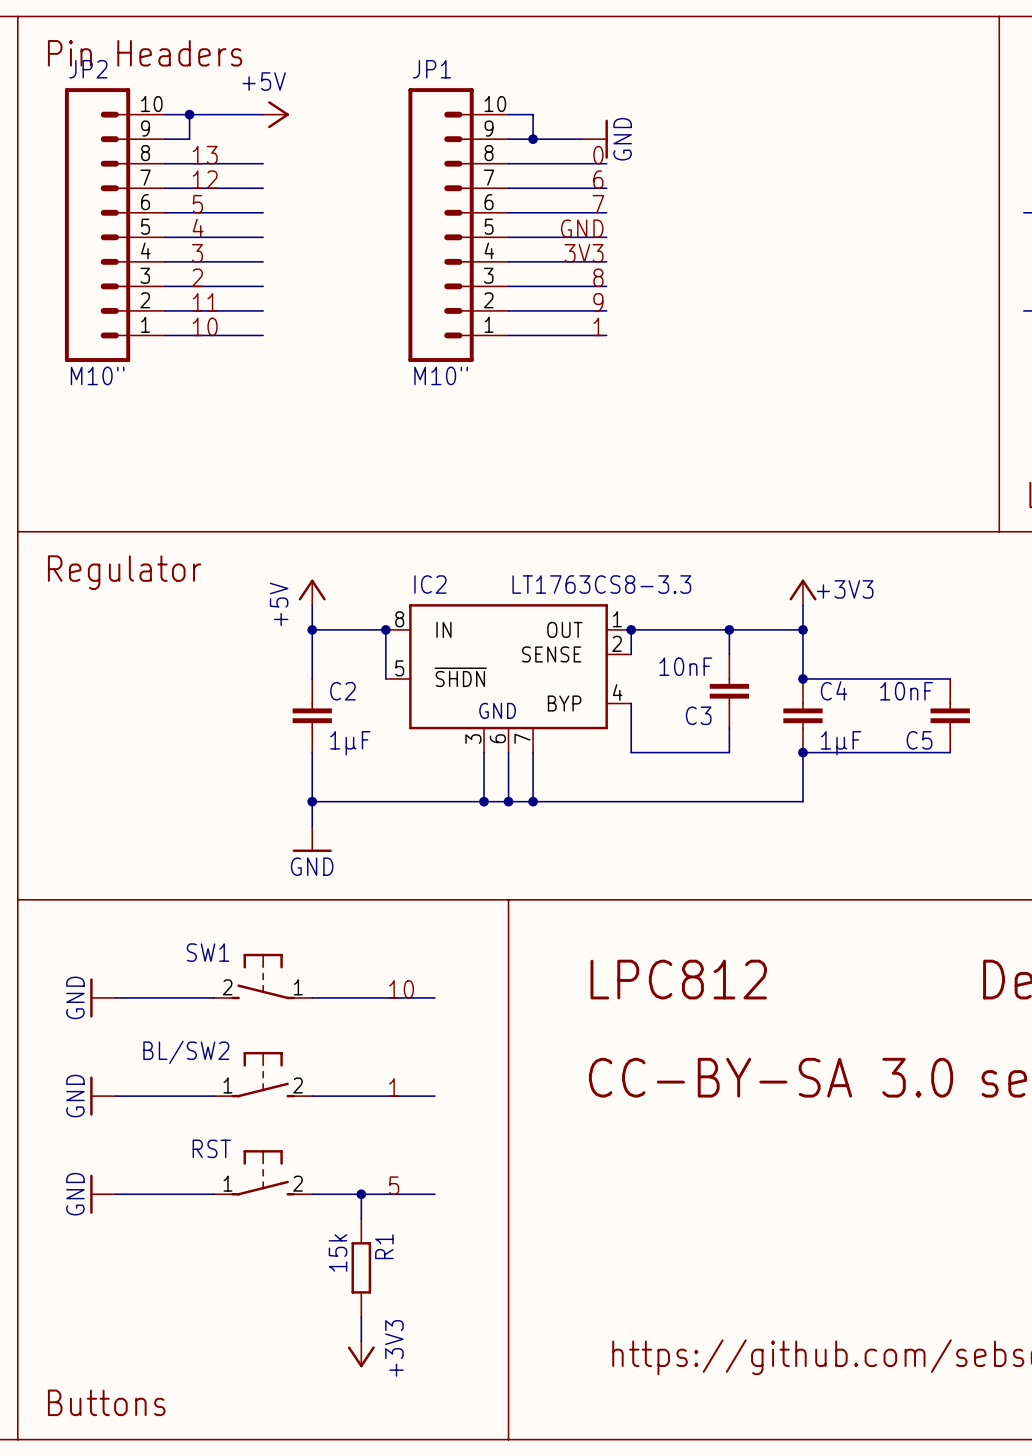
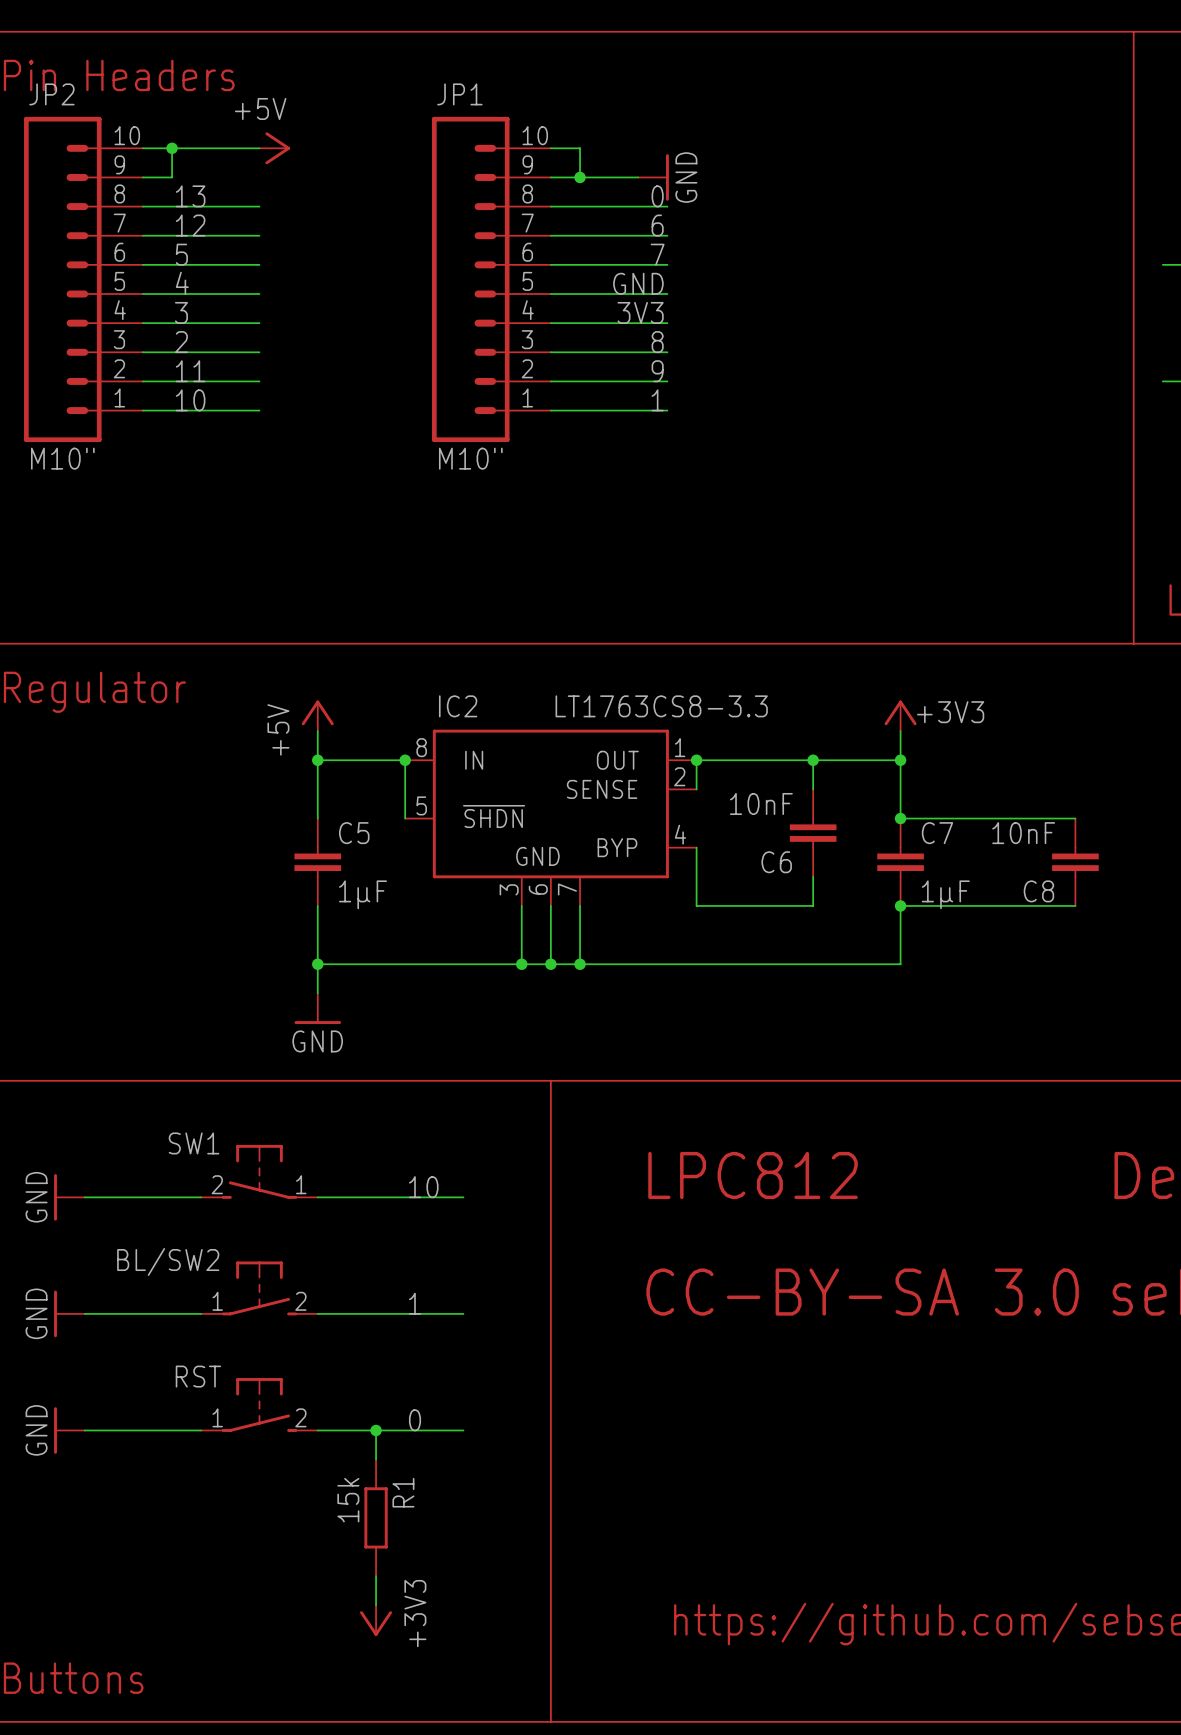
C4 name: C4 (834, 690) -> C7 (937, 833)
C2 name: C2 (342, 691) -> C5 (354, 833)
C3 name: C3 (698, 715) -> C6 (776, 862)
C5 name: C5 (919, 740) -> C8 (1038, 891)
label: 5 (394, 1185) -> 0 (415, 1420)

